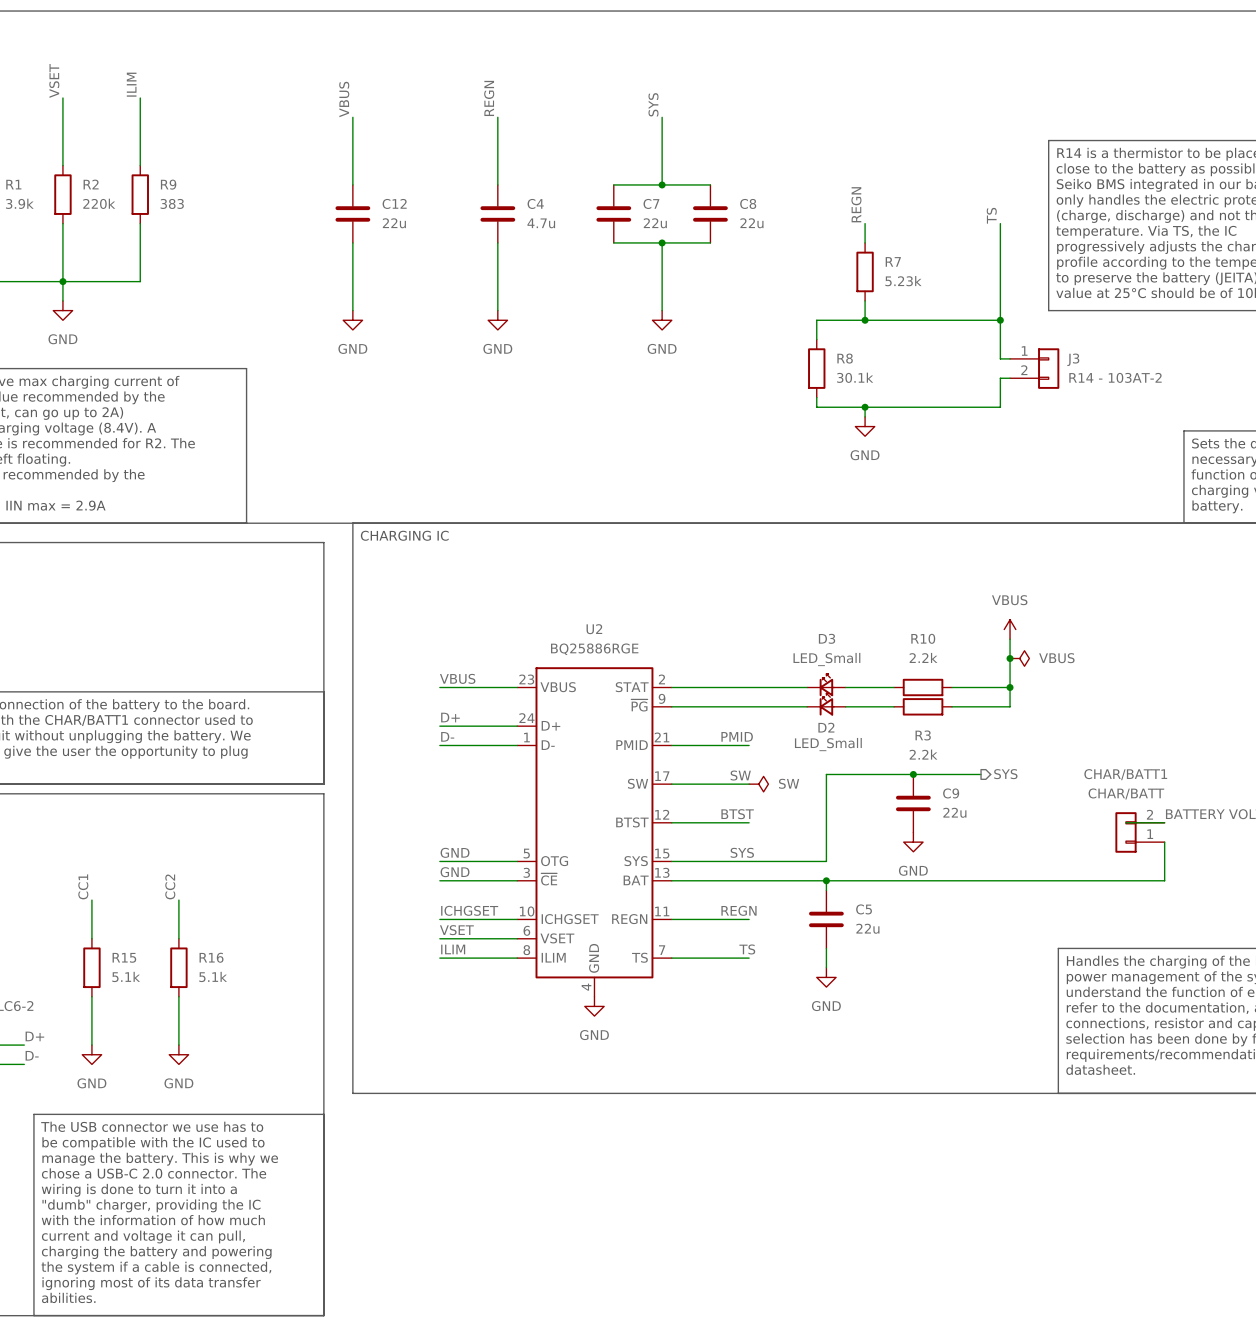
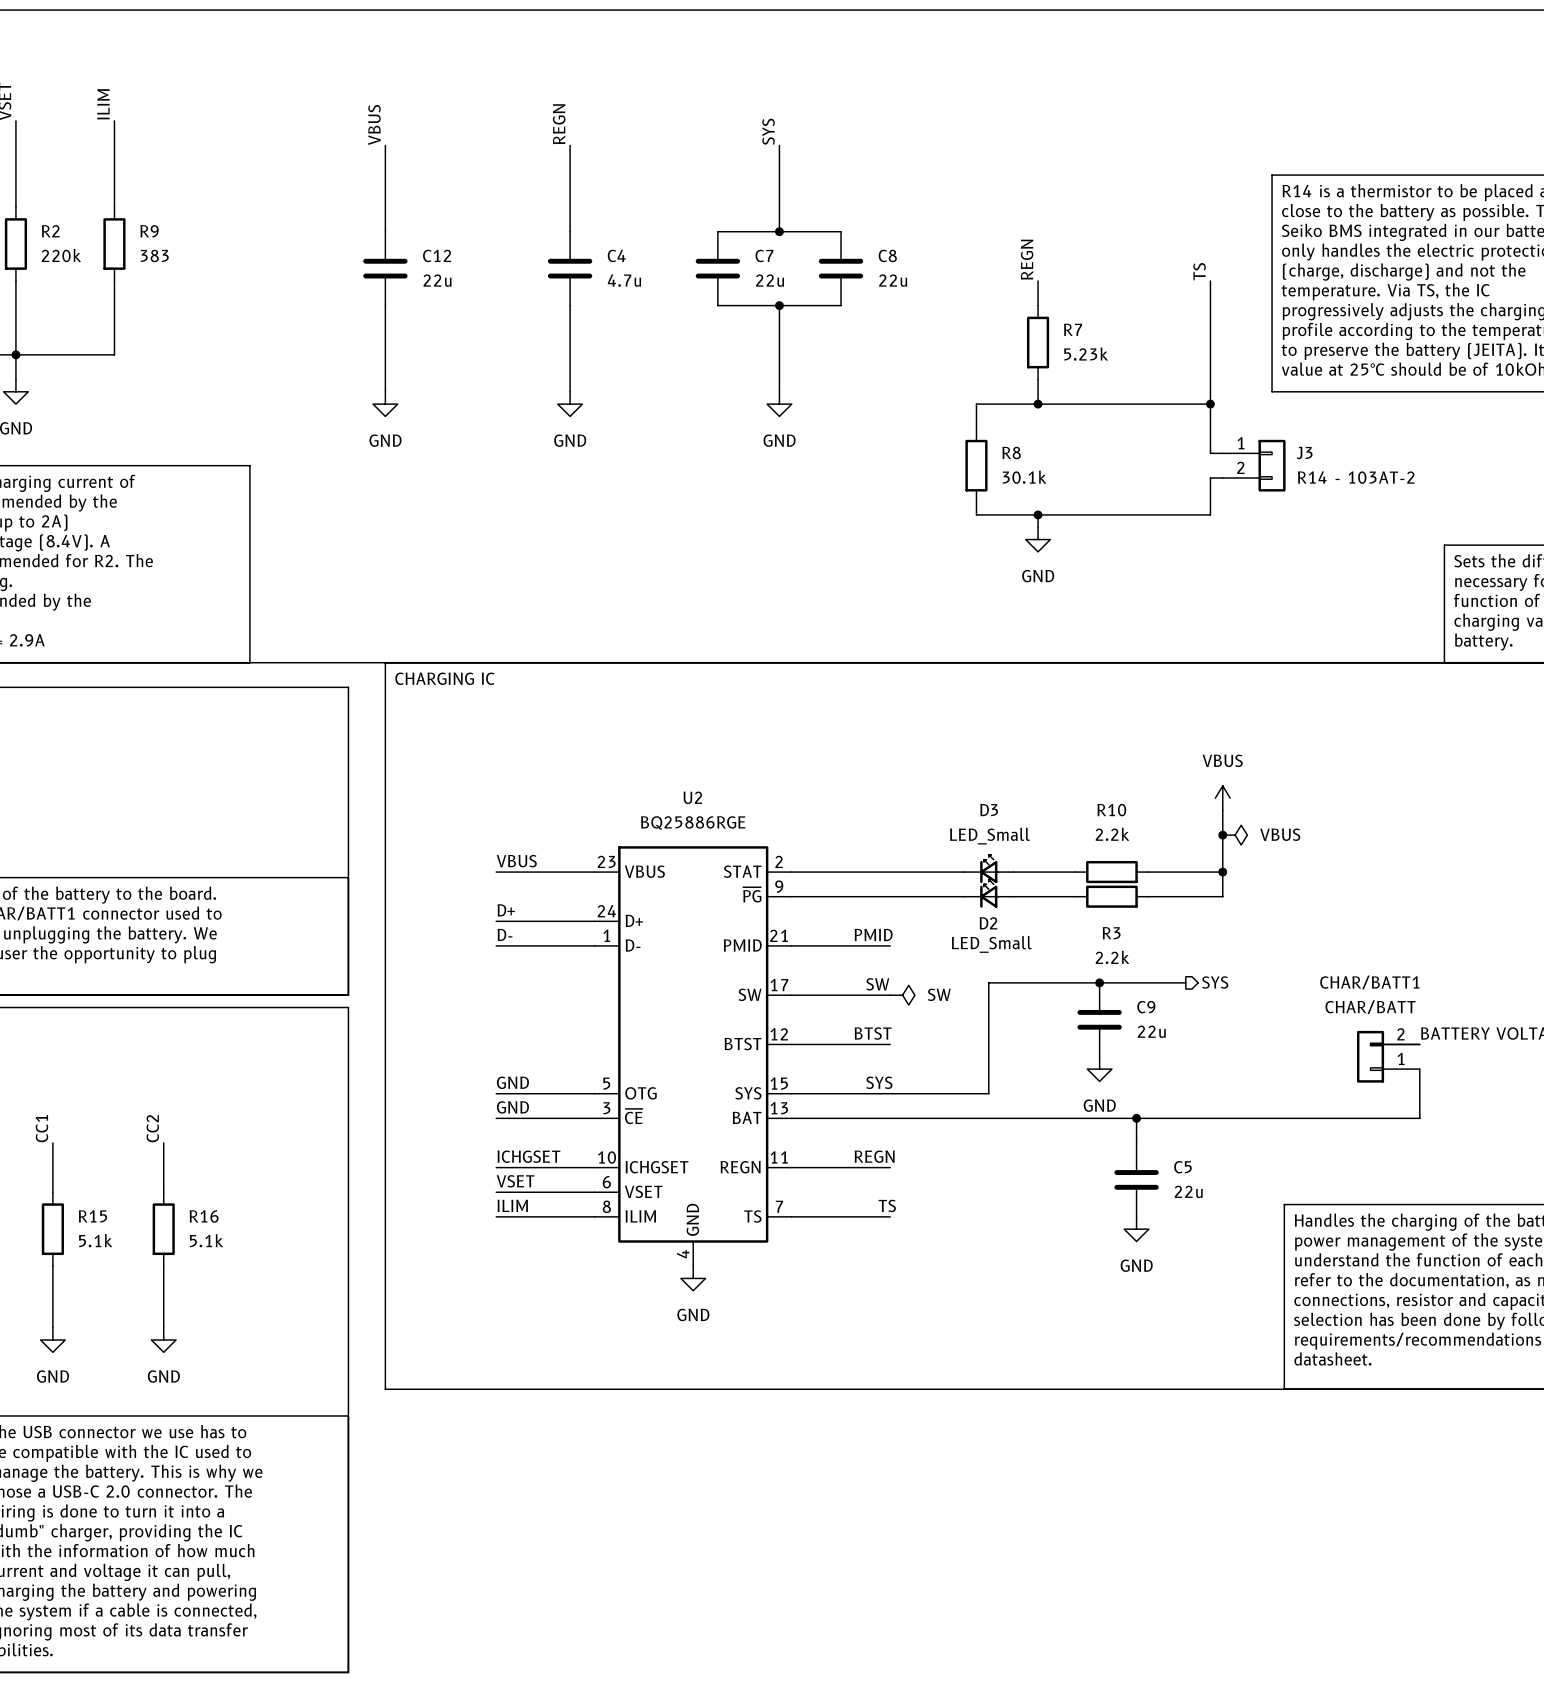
wire: (826, 880) (826, 890) -> none
junction: (826, 880) -> none
junction: none -> (1136, 1118)
C5 position: (826, 919) -> (1136, 1179)
wire: (826, 948) (826, 967) -> (1136, 1118) (1136, 1142)
power symbol position: GND (826, 977) -> GND (1136, 1229)

